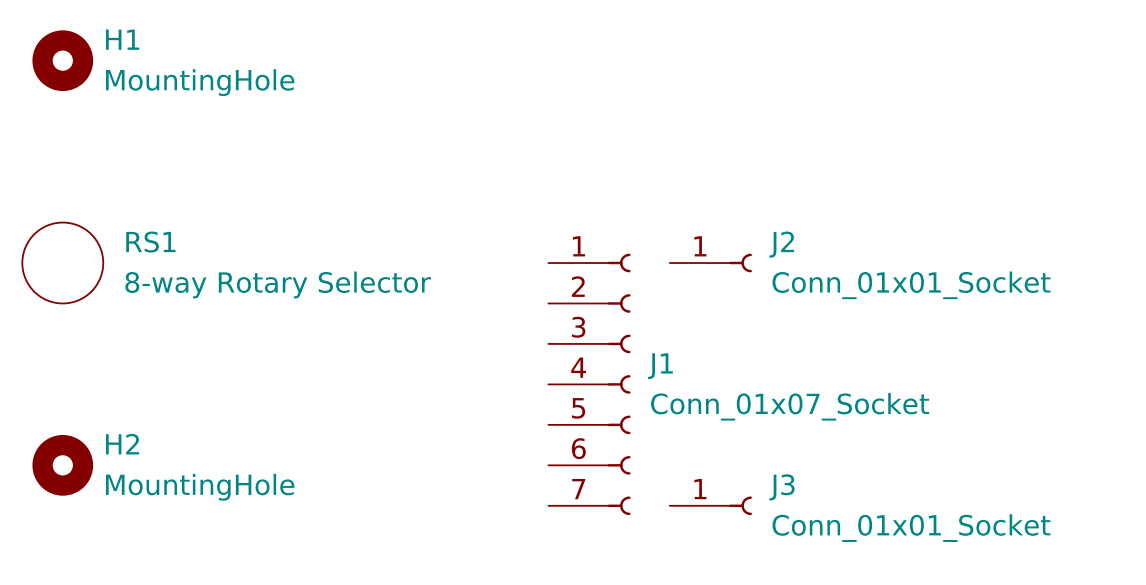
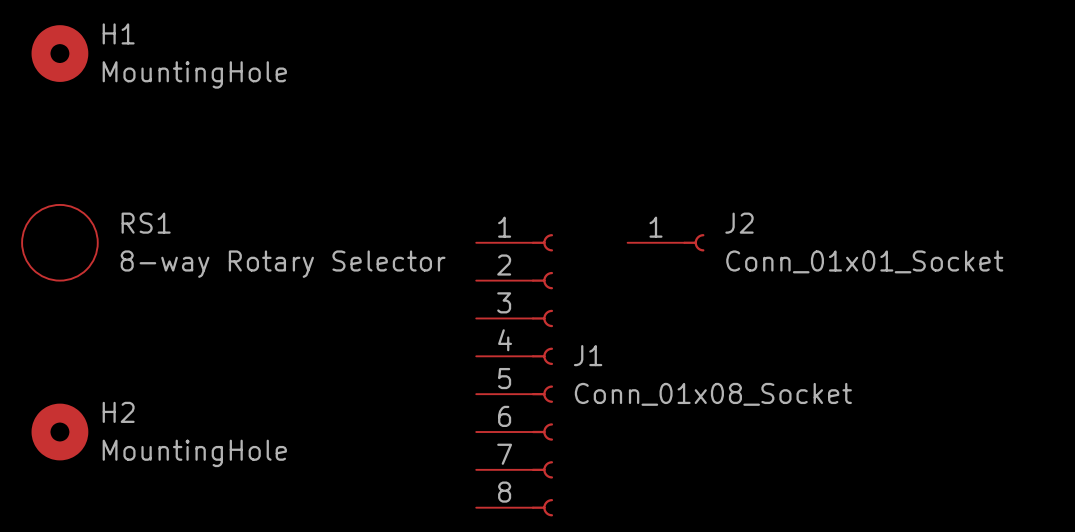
J1 symbol: [548, 253, 631, 516] -> [476, 234, 554, 517]
J1 value: Conn_01x07_Socket (790, 406) -> Conn_01x08_Socket (713, 394)
J3: Conn_01x01_Socket (710, 505) -> none

